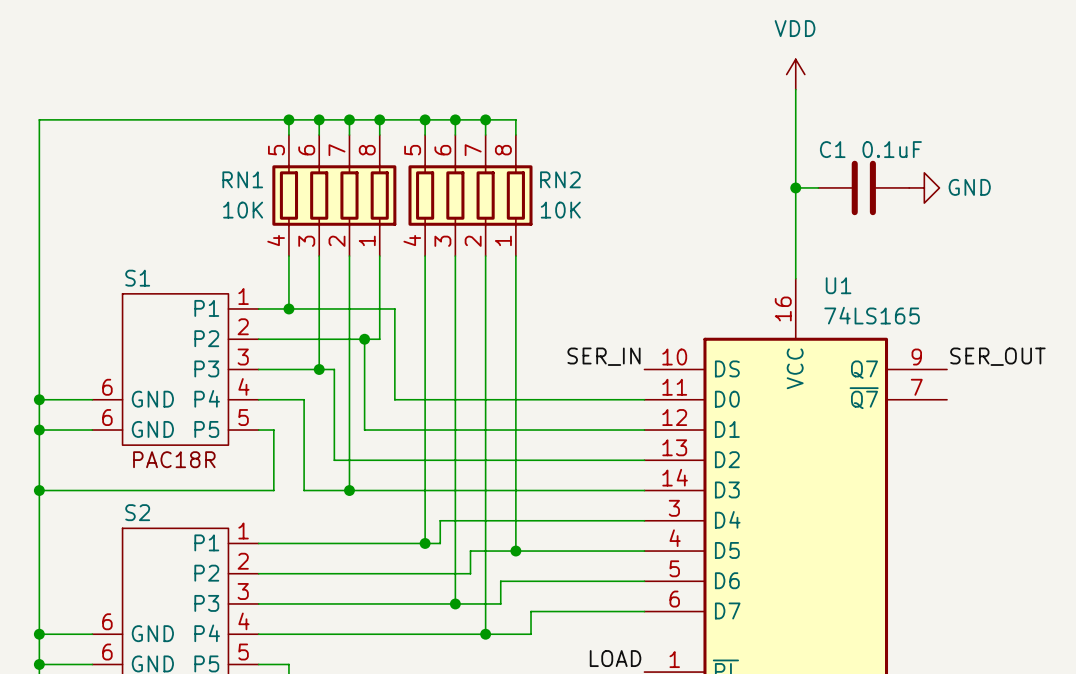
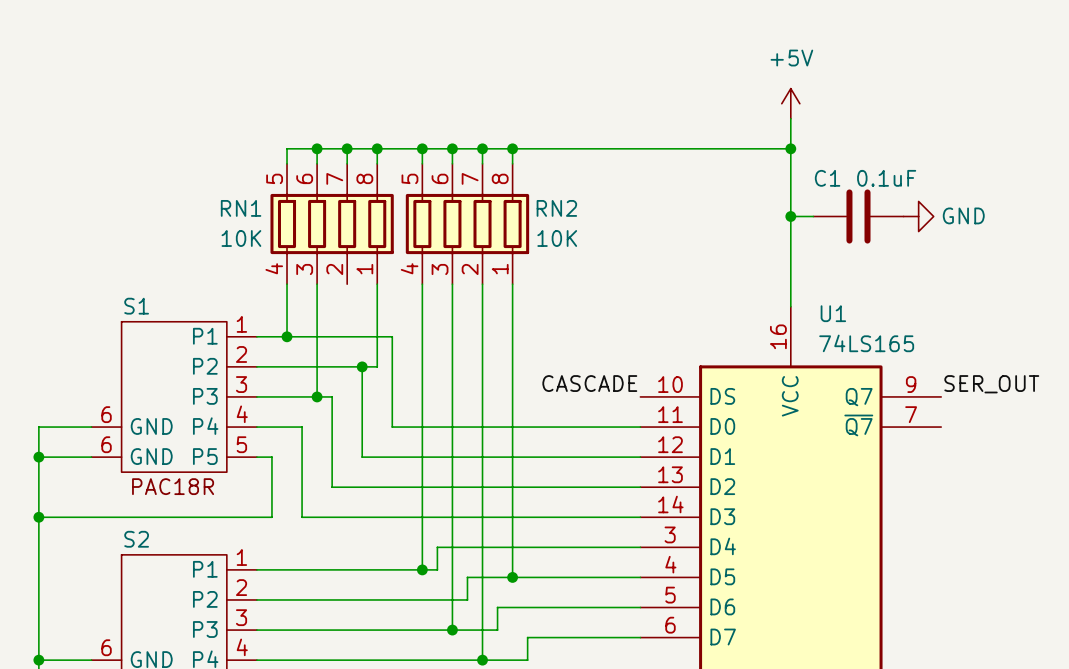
power symbol: VDD (795, 74) -> +5V (790, 103)
wire: (288, 119) (39, 119) (39, 399) -> none
junction: (288, 119) -> none
wire: none -> (512, 148) (790, 148)
junction: none -> (512, 148)
junction: none -> (790, 148)
wire: (349, 256) (349, 490) -> none
label: SER_IN (604, 356) -> CASCADE (589, 383)
junction: (39, 399) -> none
junction: (349, 490) -> none

